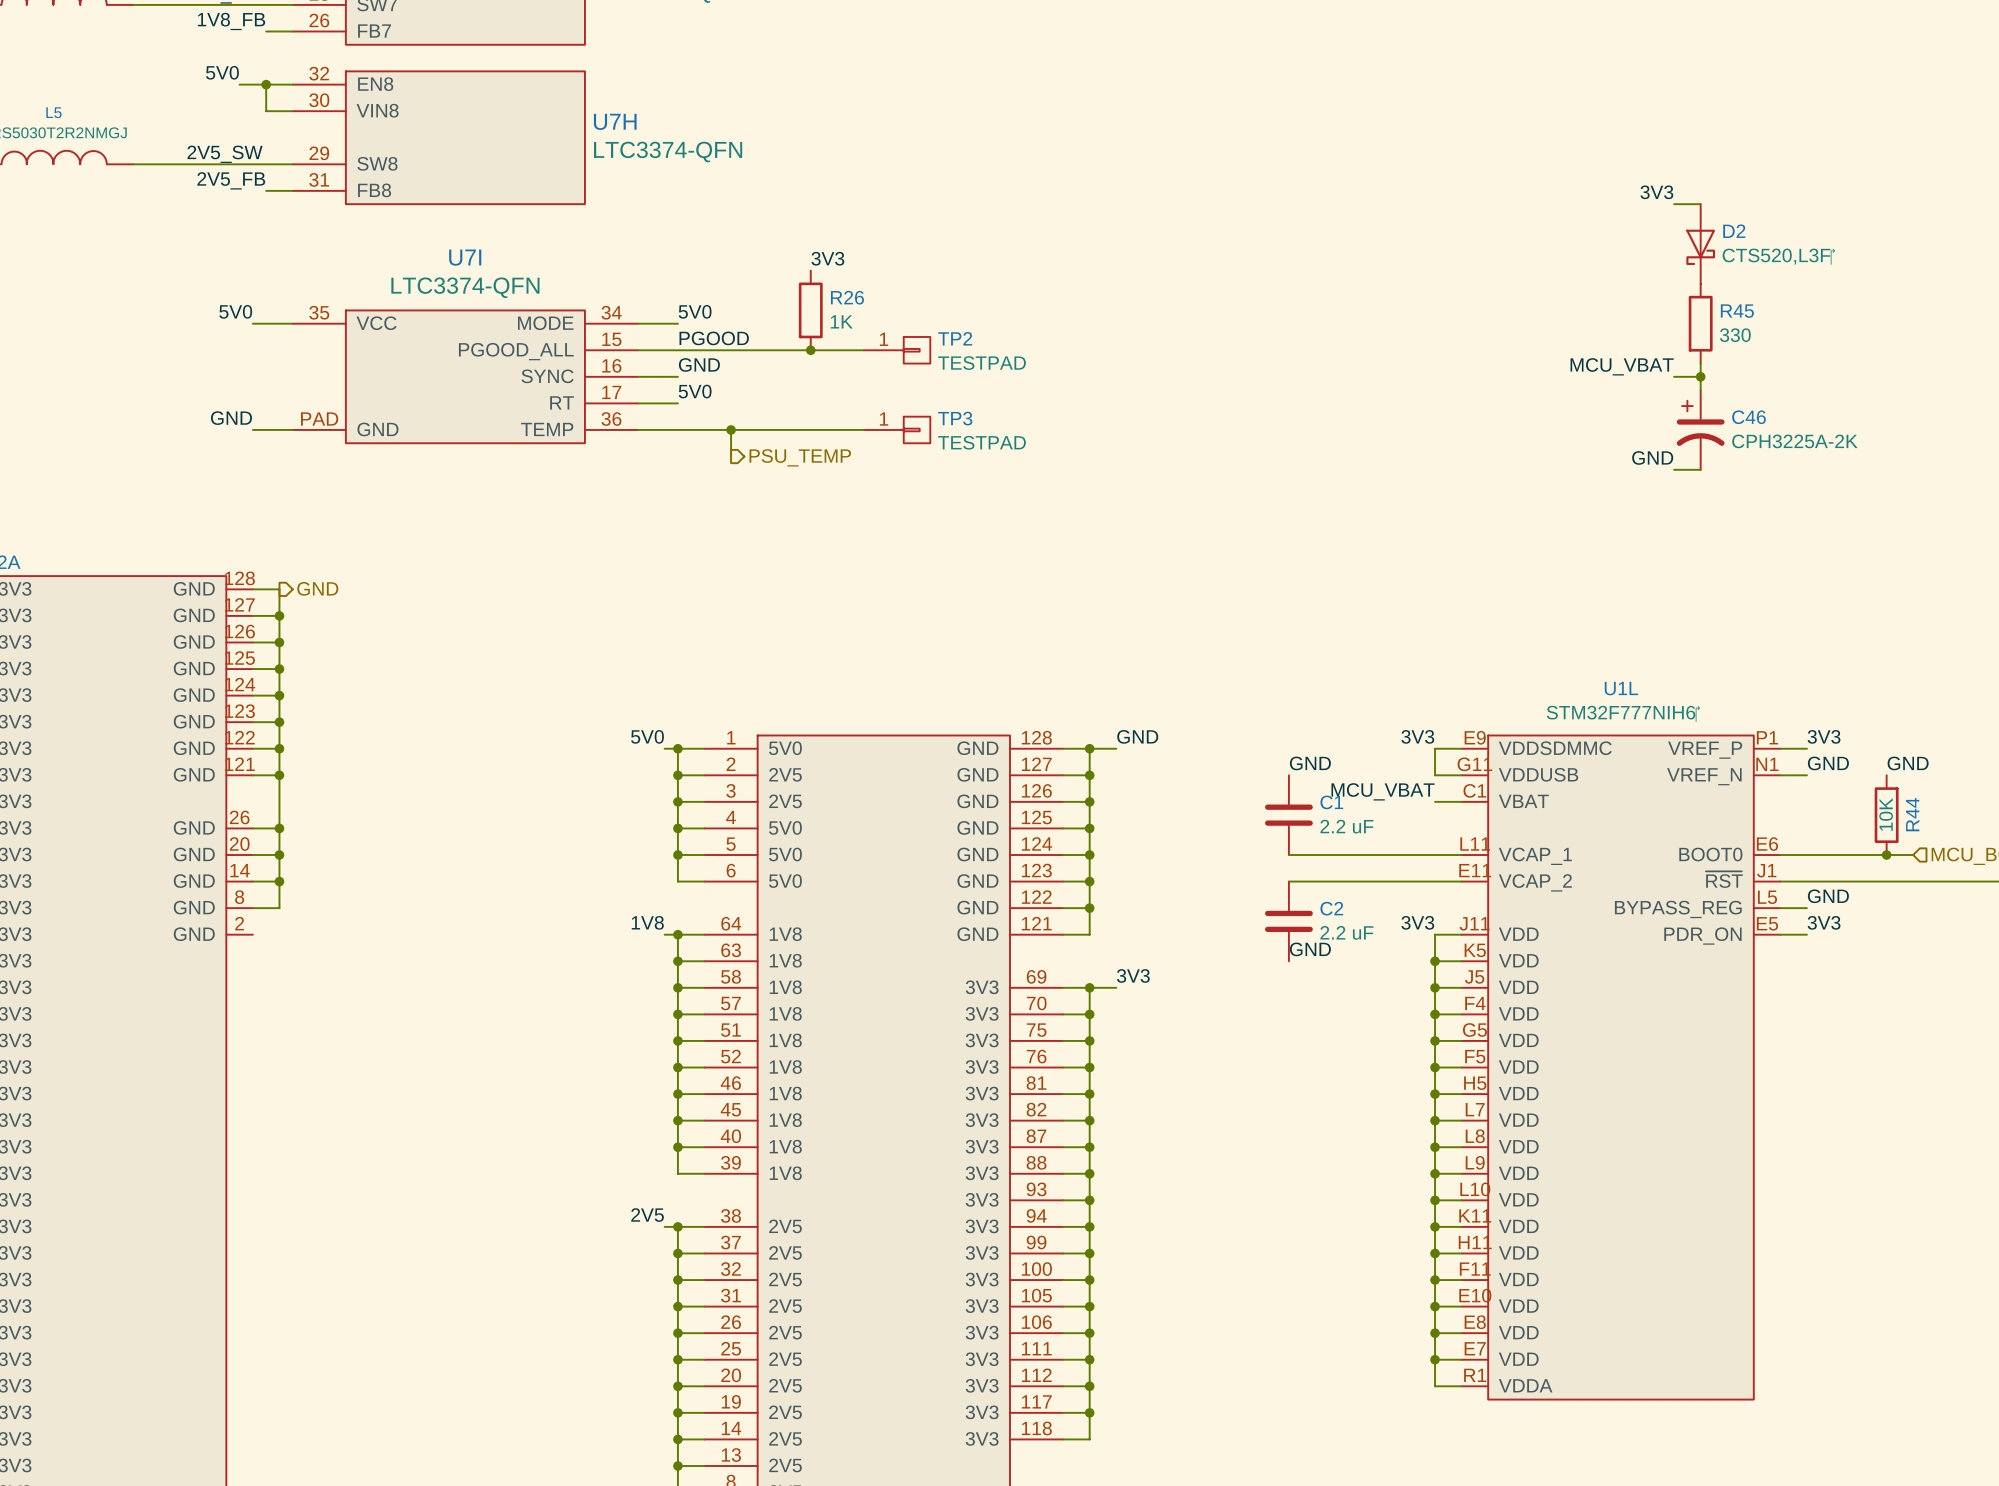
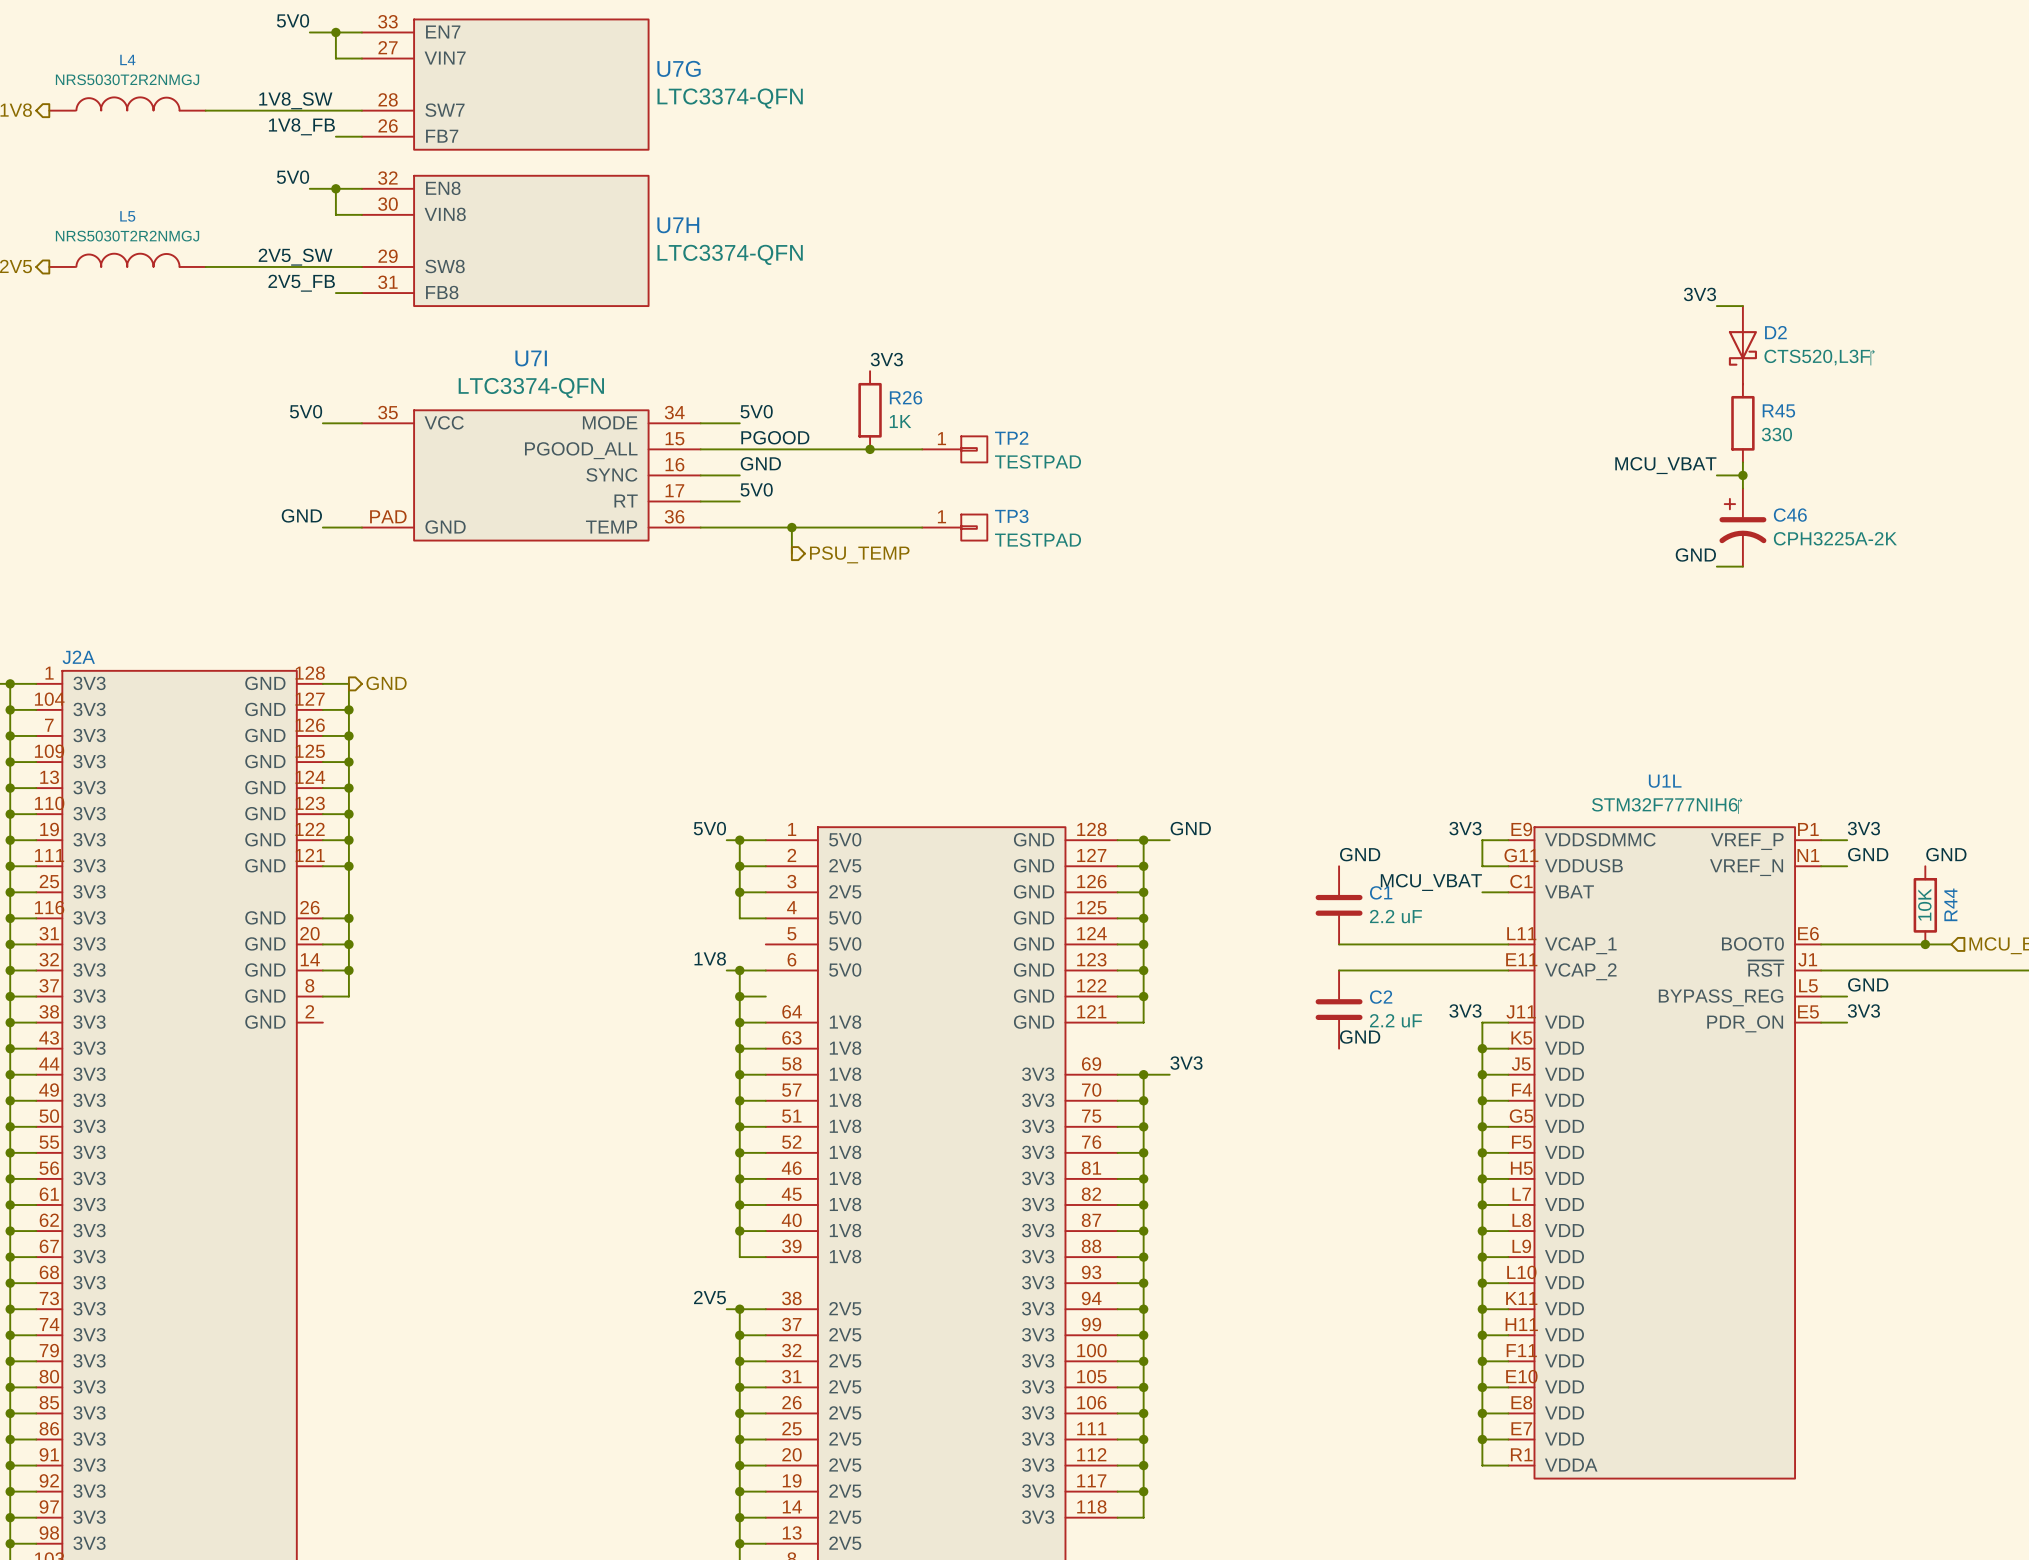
wire: (677, 828) (677, 881) -> none
junction: (677, 828) -> none
wire: (677, 855) (704, 855) -> (739, 996) (765, 996)
junction: (677, 855) -> none
junction: none -> (739, 970)
junction: none -> (739, 996)
label position: 1V8 (647, 922) -> 1V8 (710, 958)
wire: (664, 934) (677, 934) -> (726, 970) (739, 970) (739, 1022)

